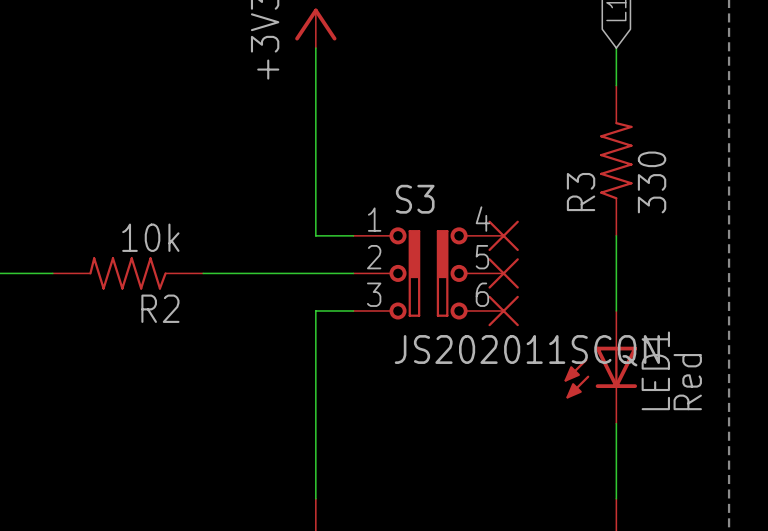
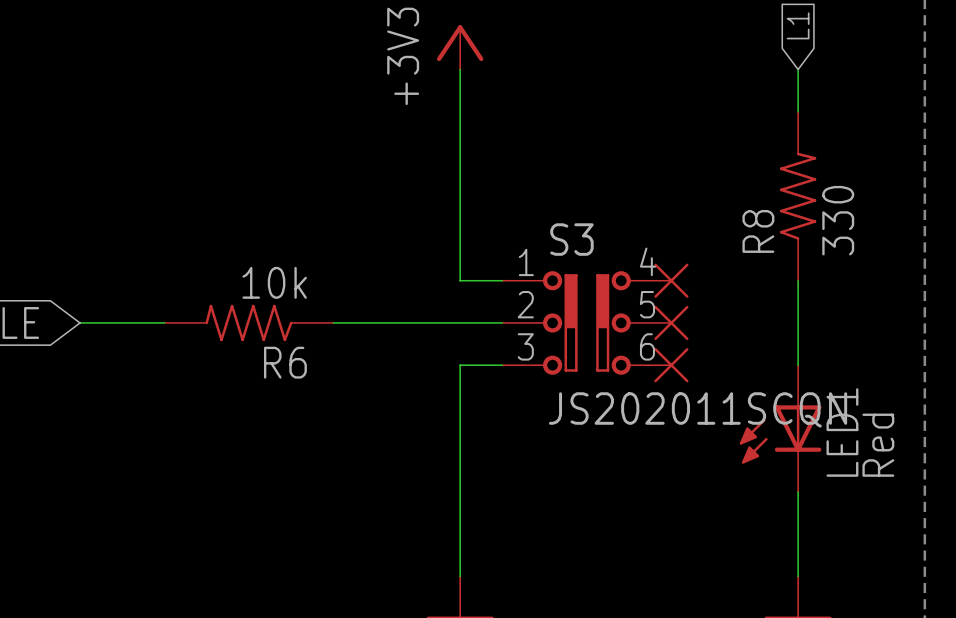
R3 name: R3 (581, 192) -> R8 (758, 231)
R2 name: R2 (160, 308) -> R6 (285, 362)

